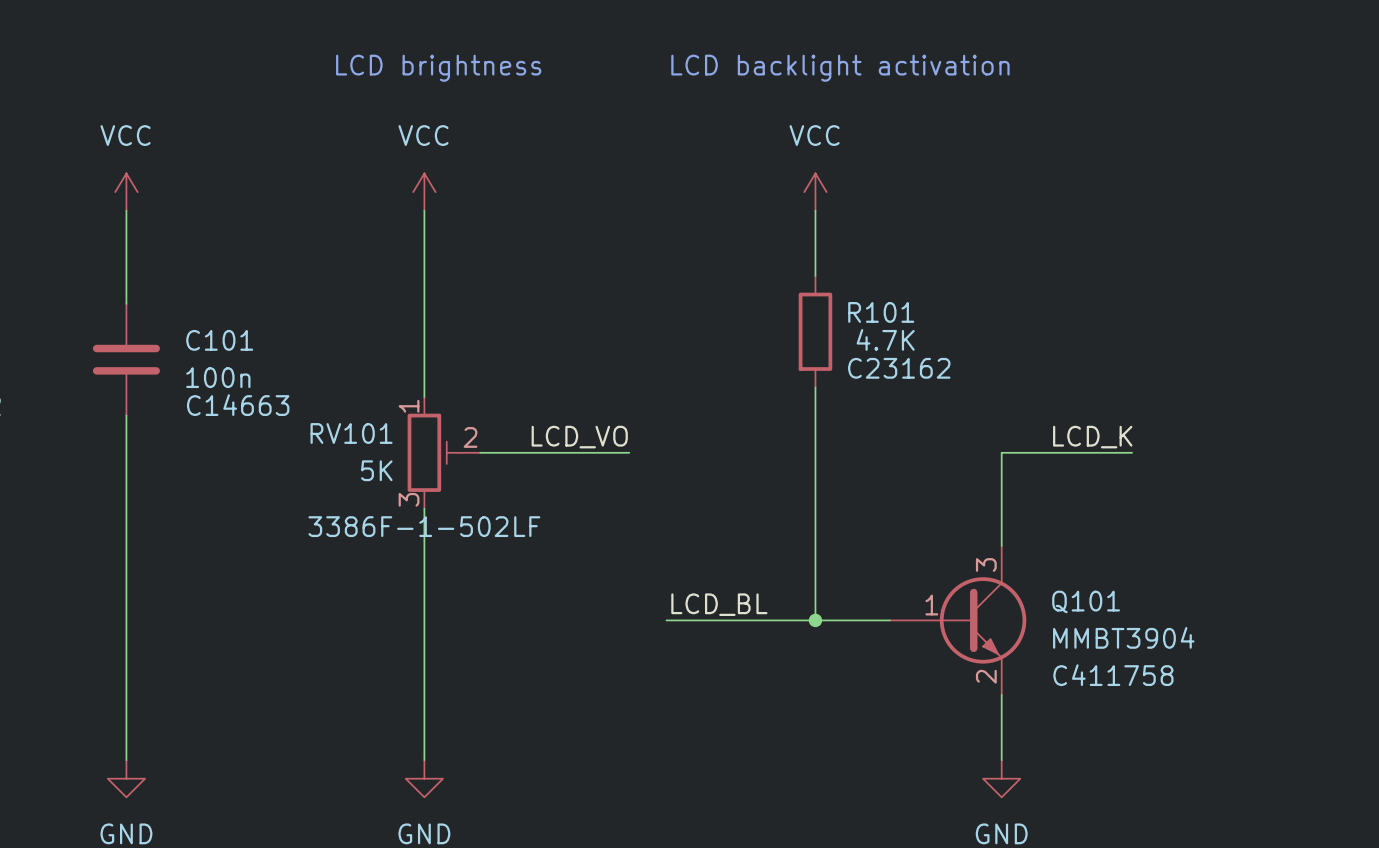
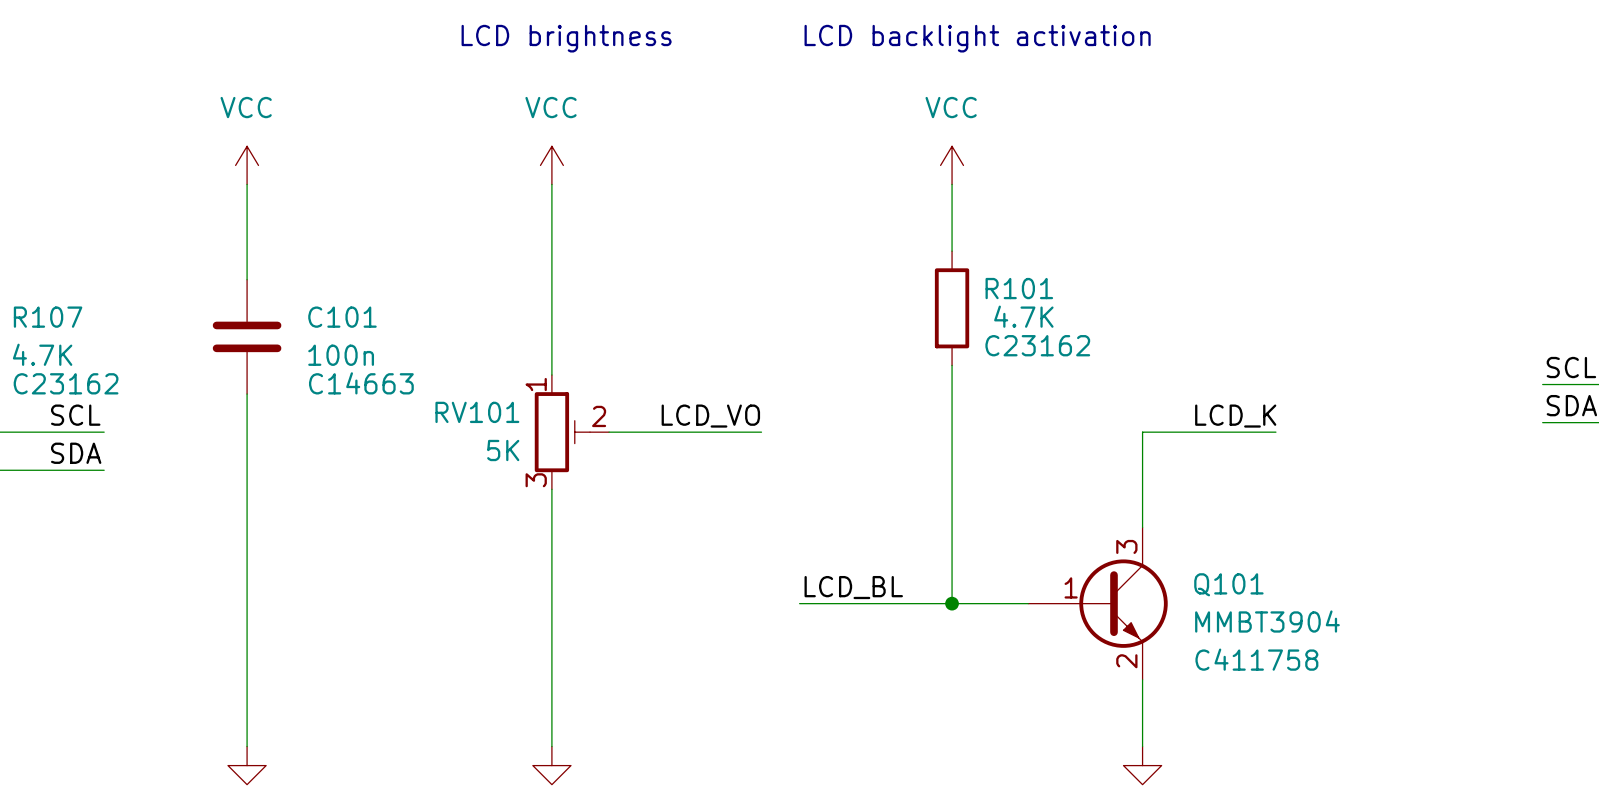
RV101 text: 3386F-1-502LF (424, 526) -> none

